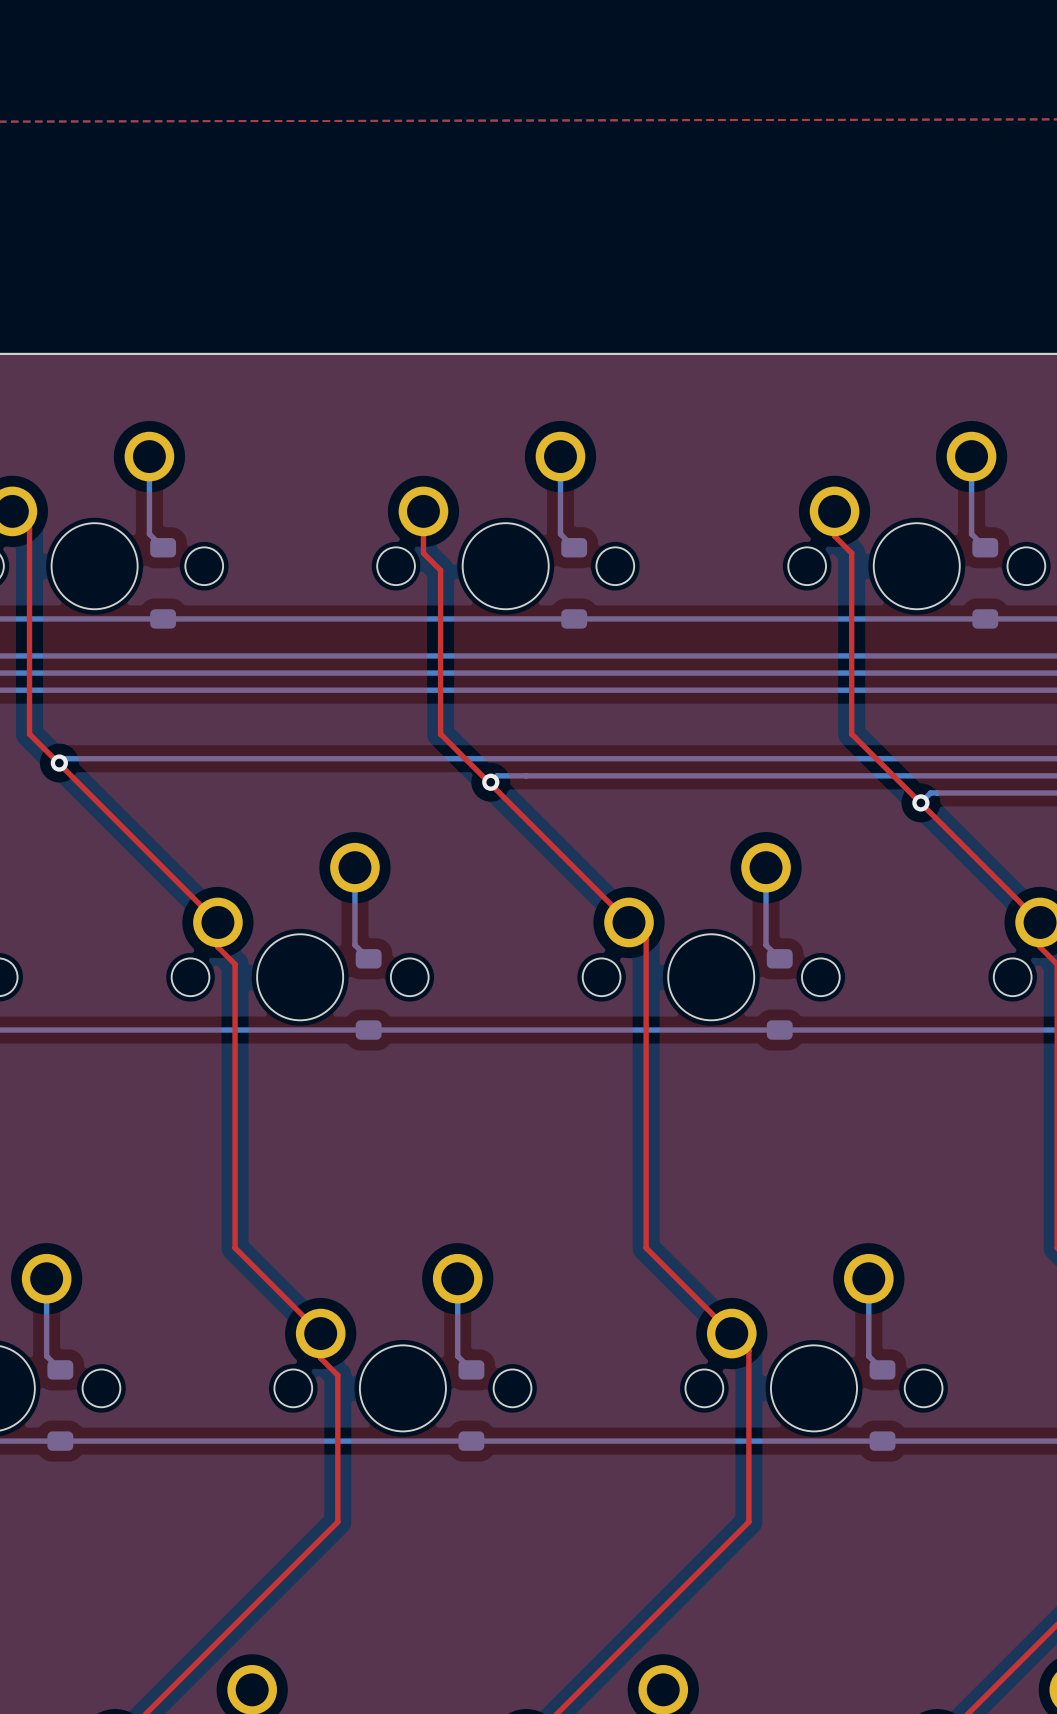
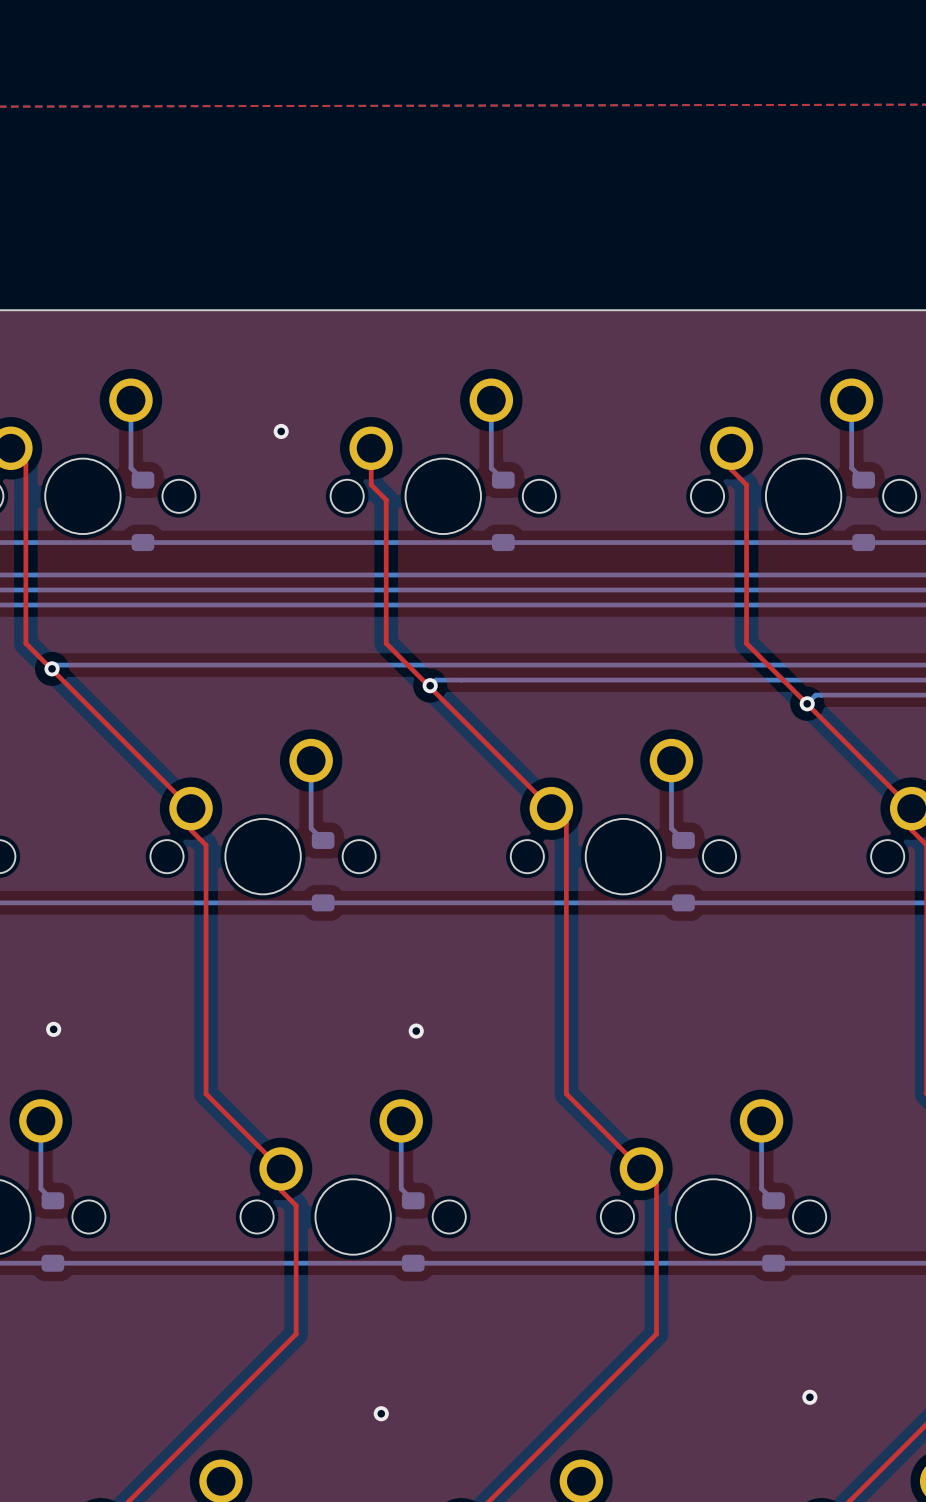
via: none -> (281, 431)
via: none -> (53, 1029)
via: none -> (416, 1031)
via: none -> (809, 1397)
via: none -> (381, 1413)

